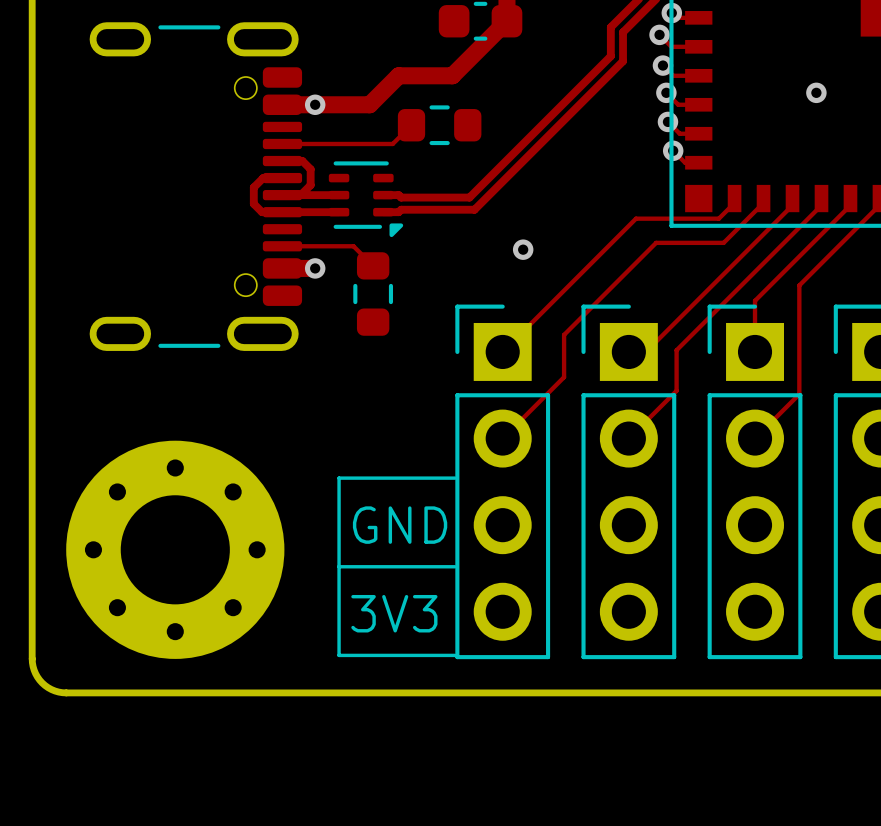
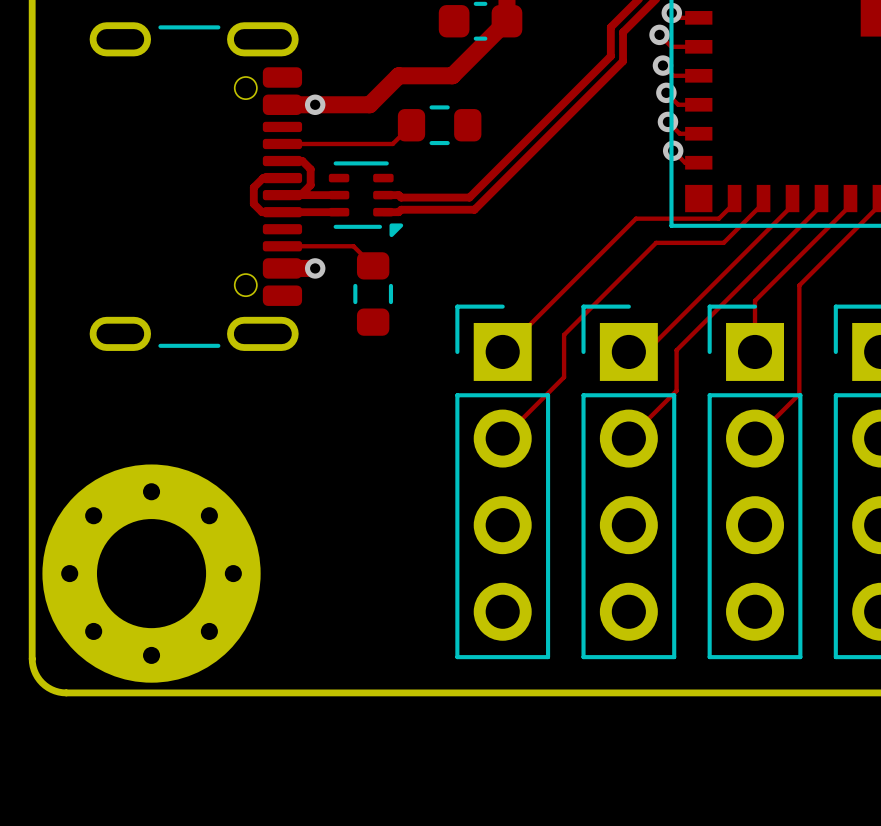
via: (816, 92) -> none
via: (523, 249) -> none
line: (454, 478) (339, 478) (339, 655) (454, 655) -> none
text: GND (400, 525) -> none
part position: (175, 549) -> (151, 573)
line: (339, 566) (454, 566) -> none
text: 3V3 (394, 613) -> none

